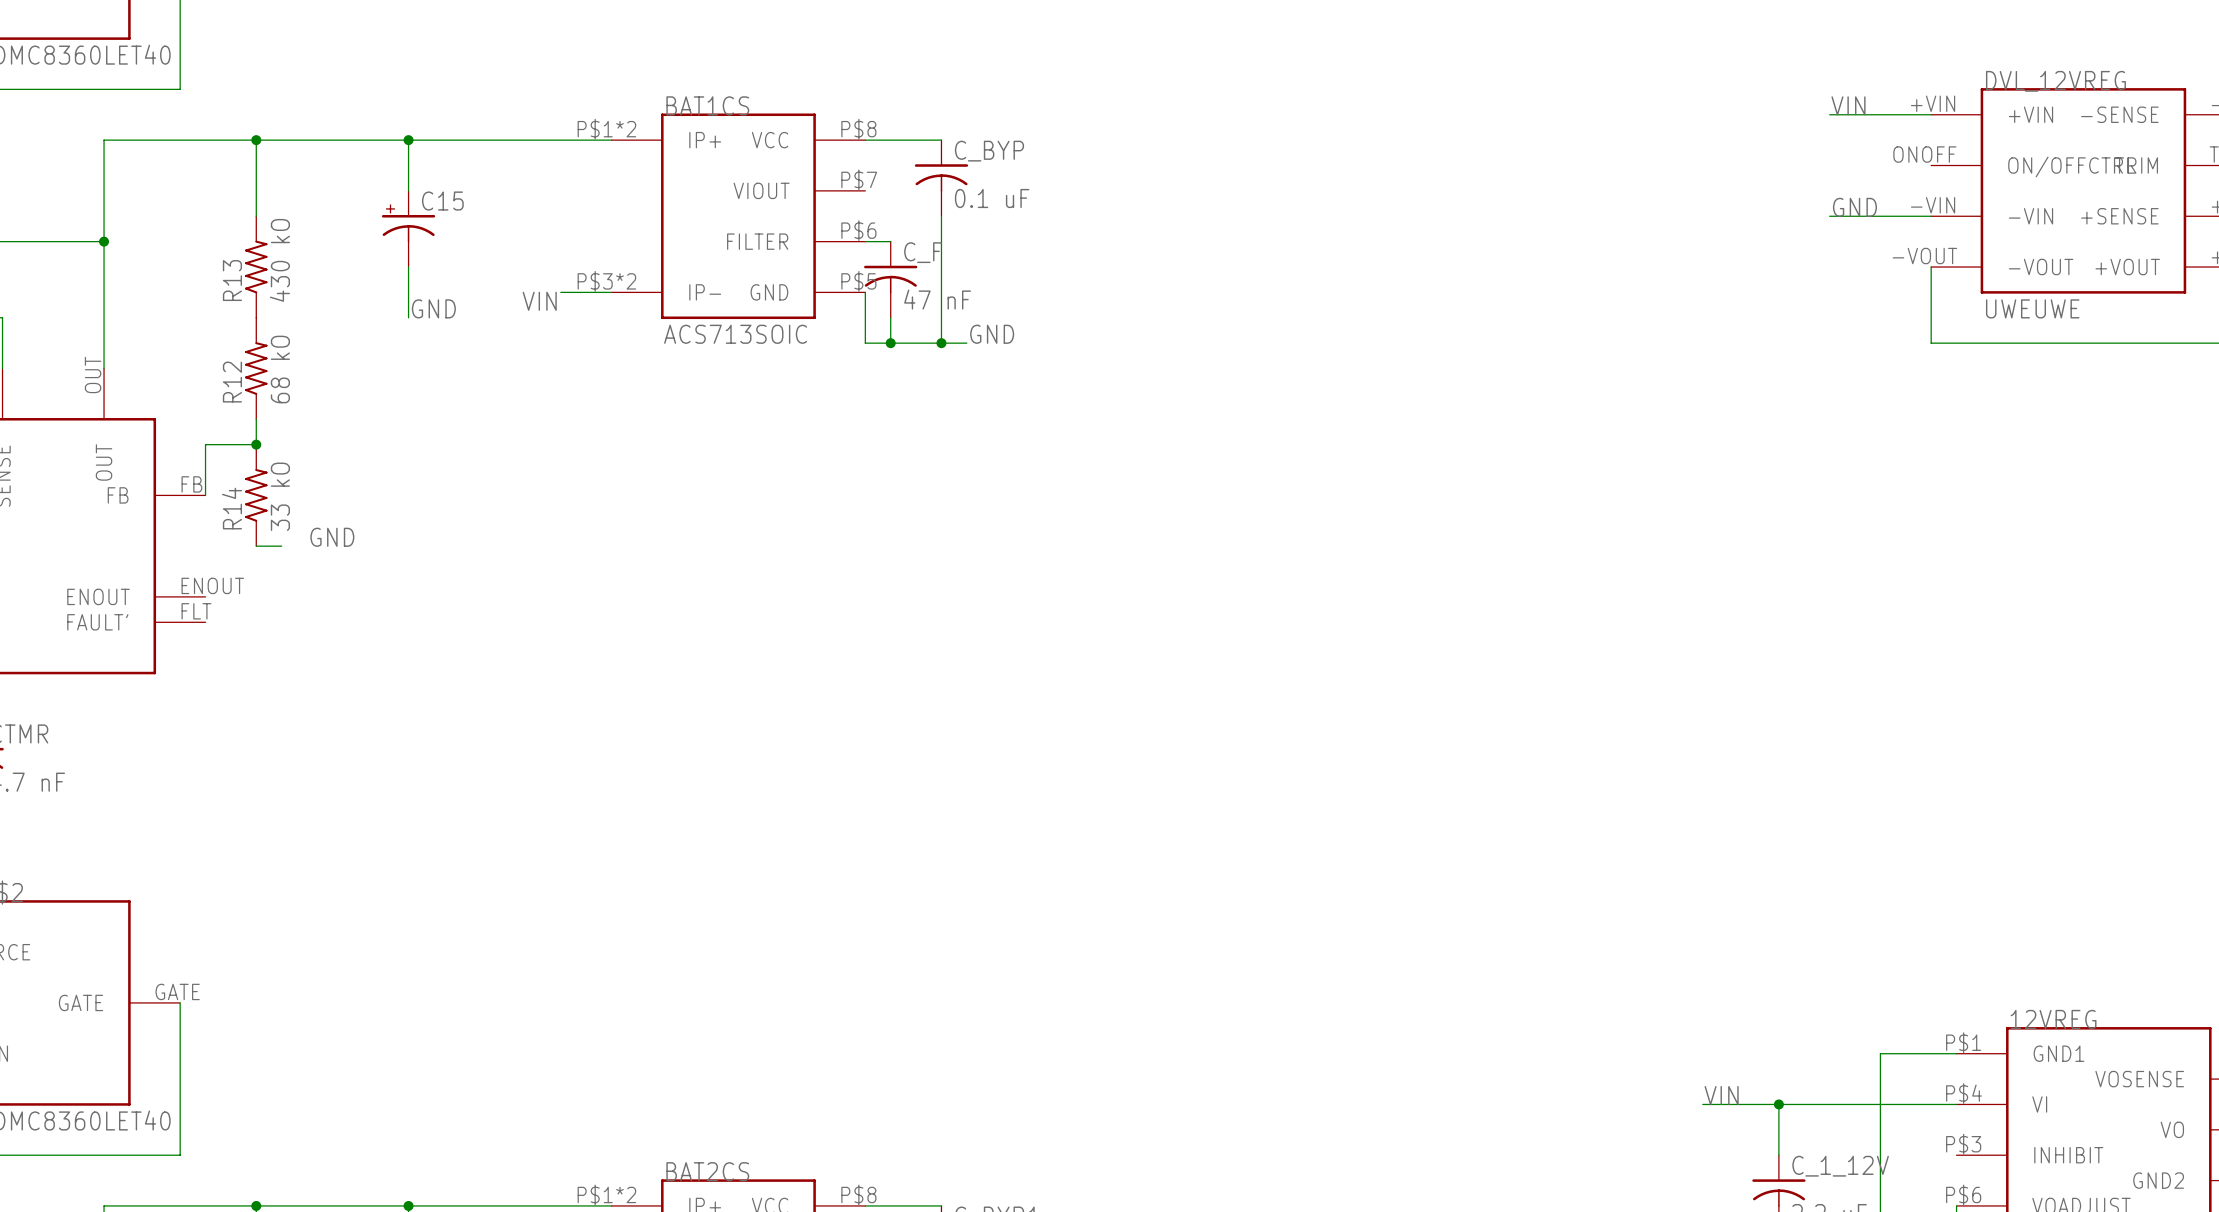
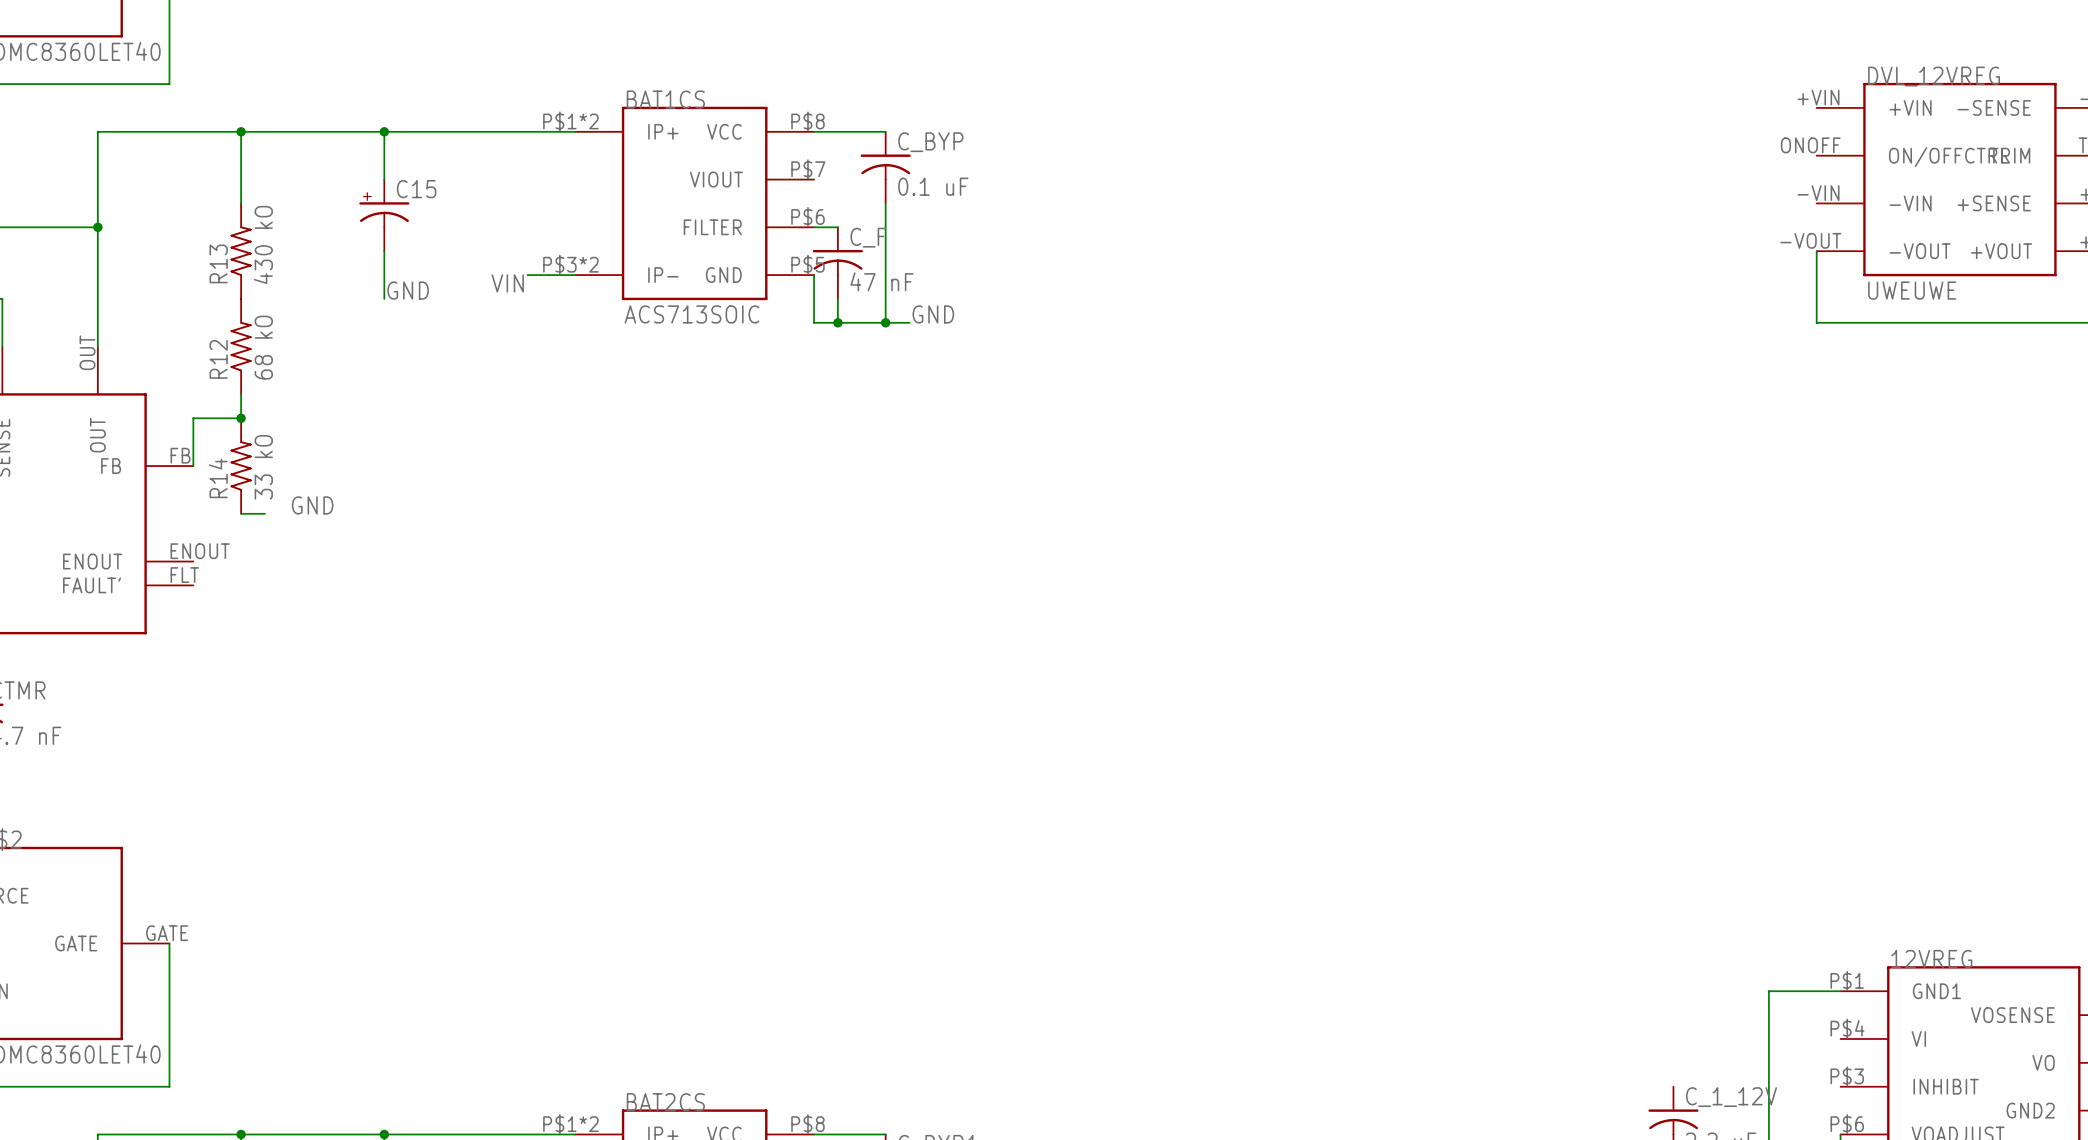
label: VIN (1848, 105) -> none
wire: (1829, 114) (1931, 114) -> none
label: GND (1854, 207) -> none
wire: (1829, 216) (1931, 216) -> none
label: VIN (1721, 1095) -> none
wire: (1702, 1104) (1956, 1104) -> none
wire: (1778, 1104) (1778, 1155) -> none
junction: (1778, 1104) -> none

